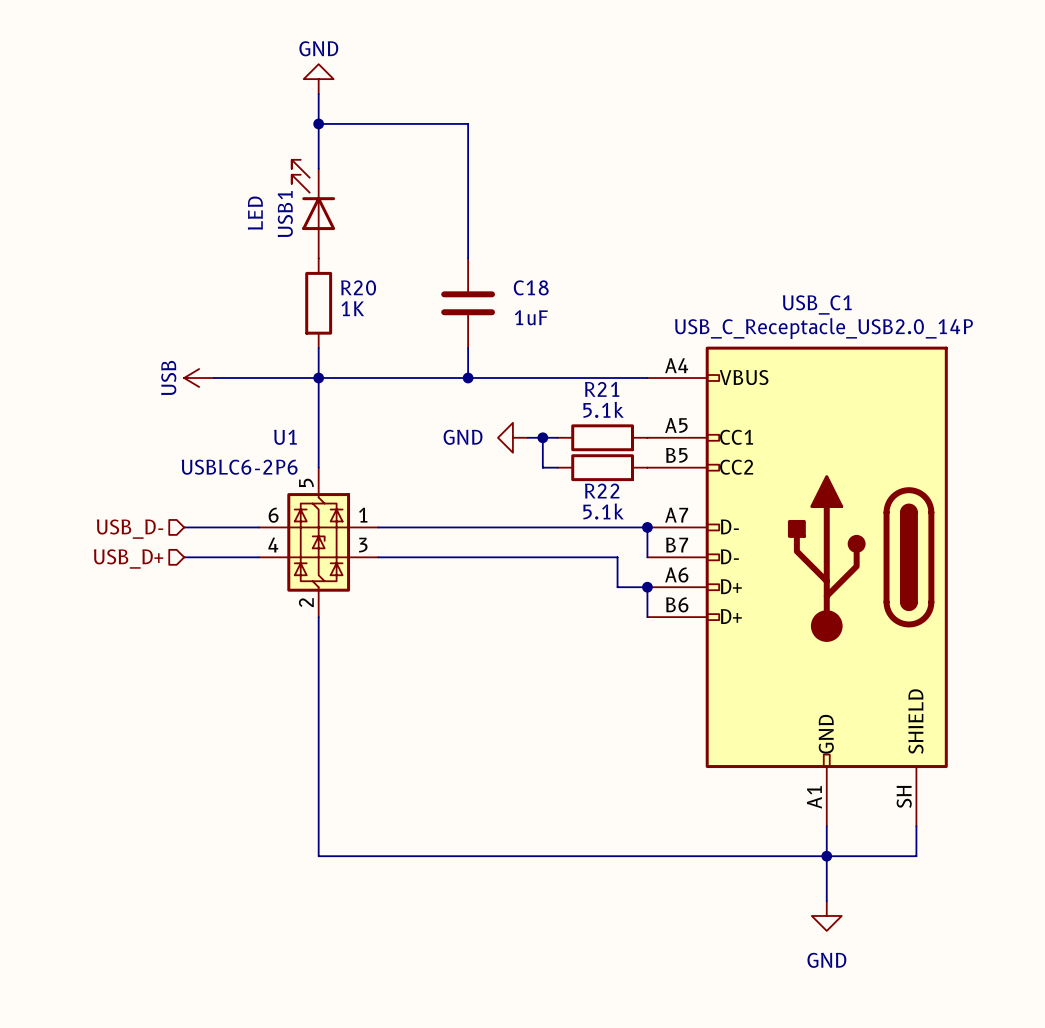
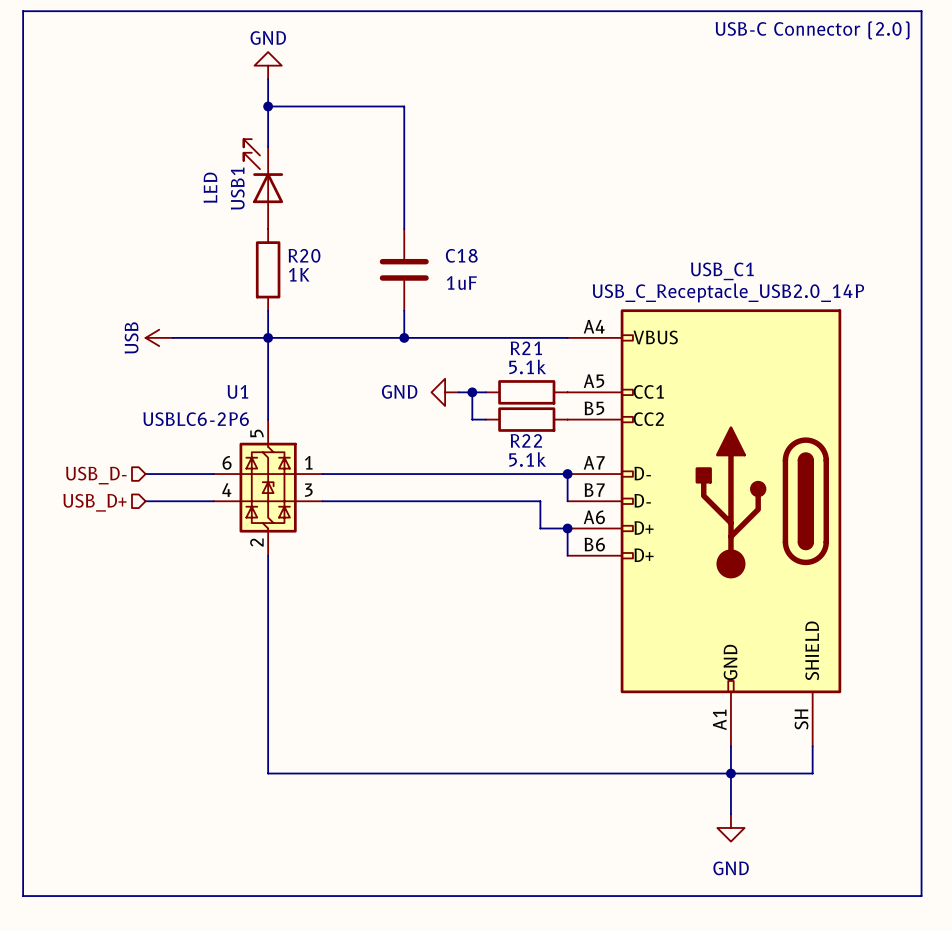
line: none -> (23, 11) (921, 11) (921, 896) (23, 896) (23, 11)
text: none -> USB-C Connector (2.0) (812, 30)

